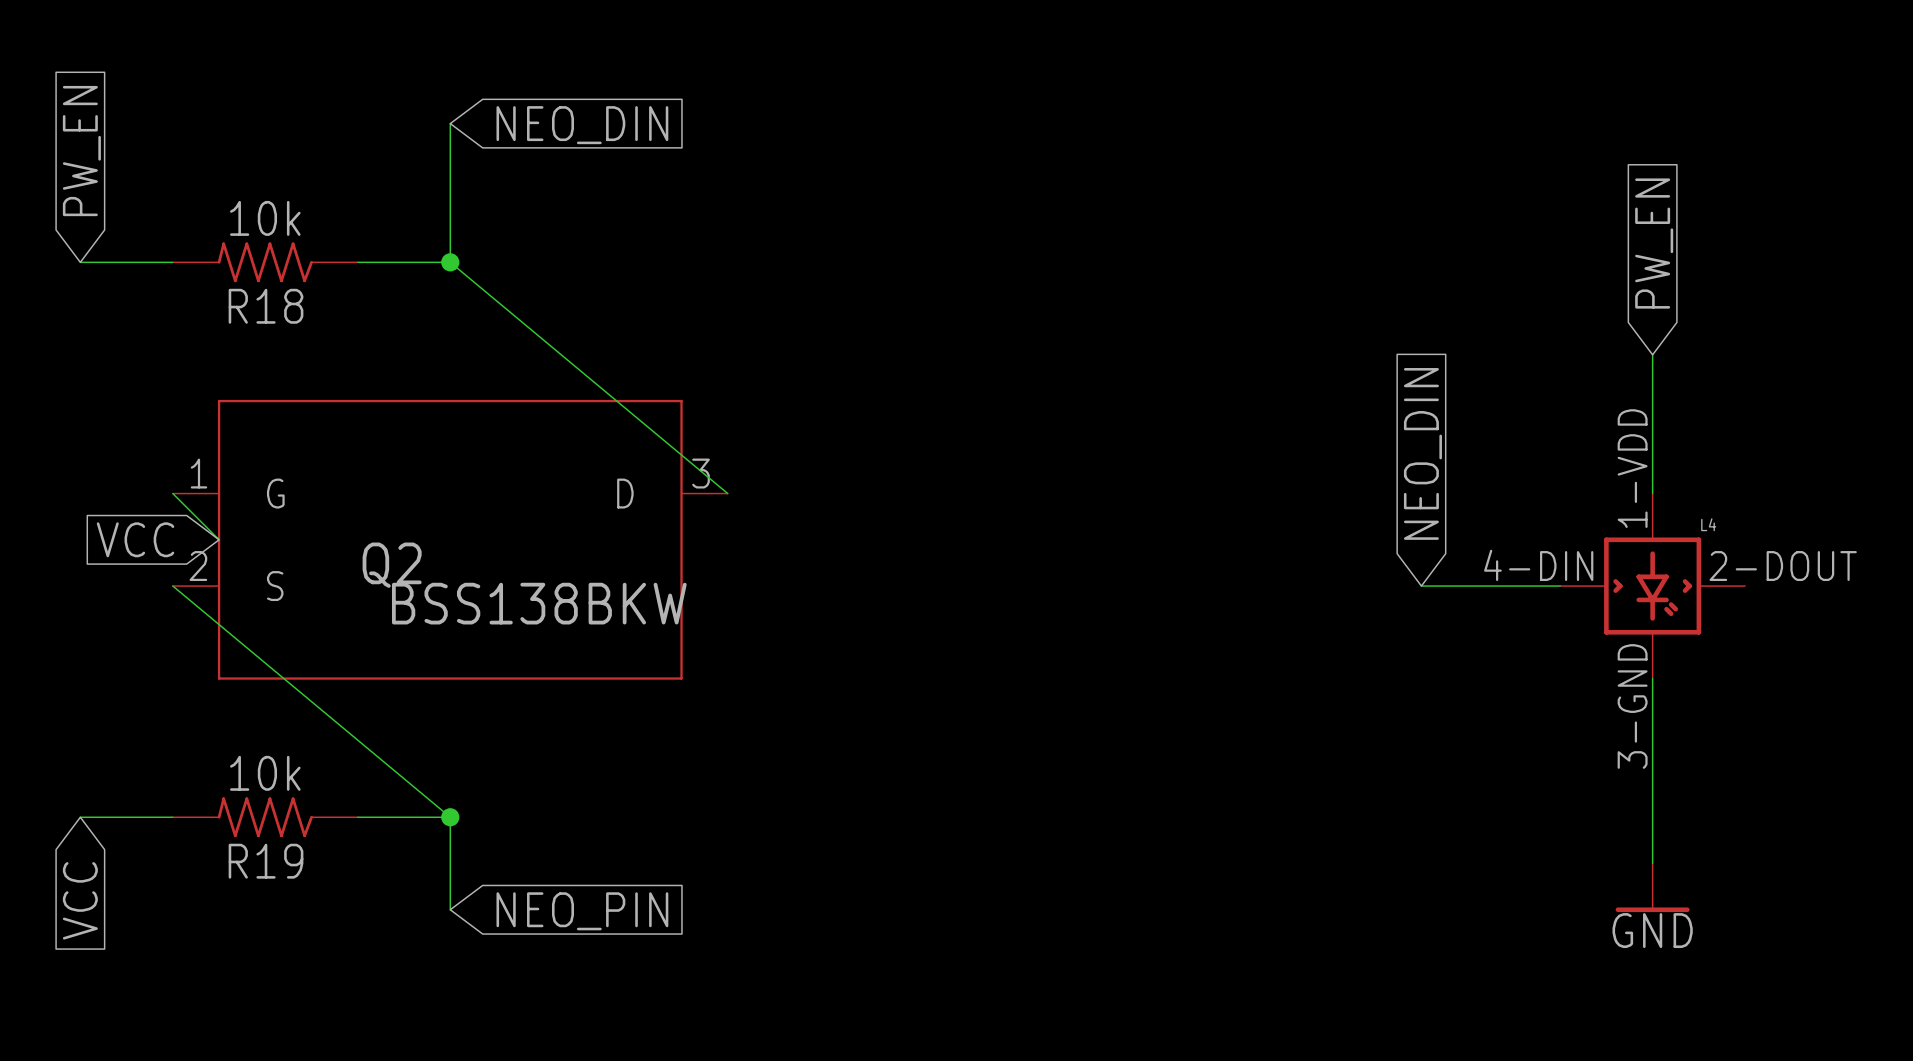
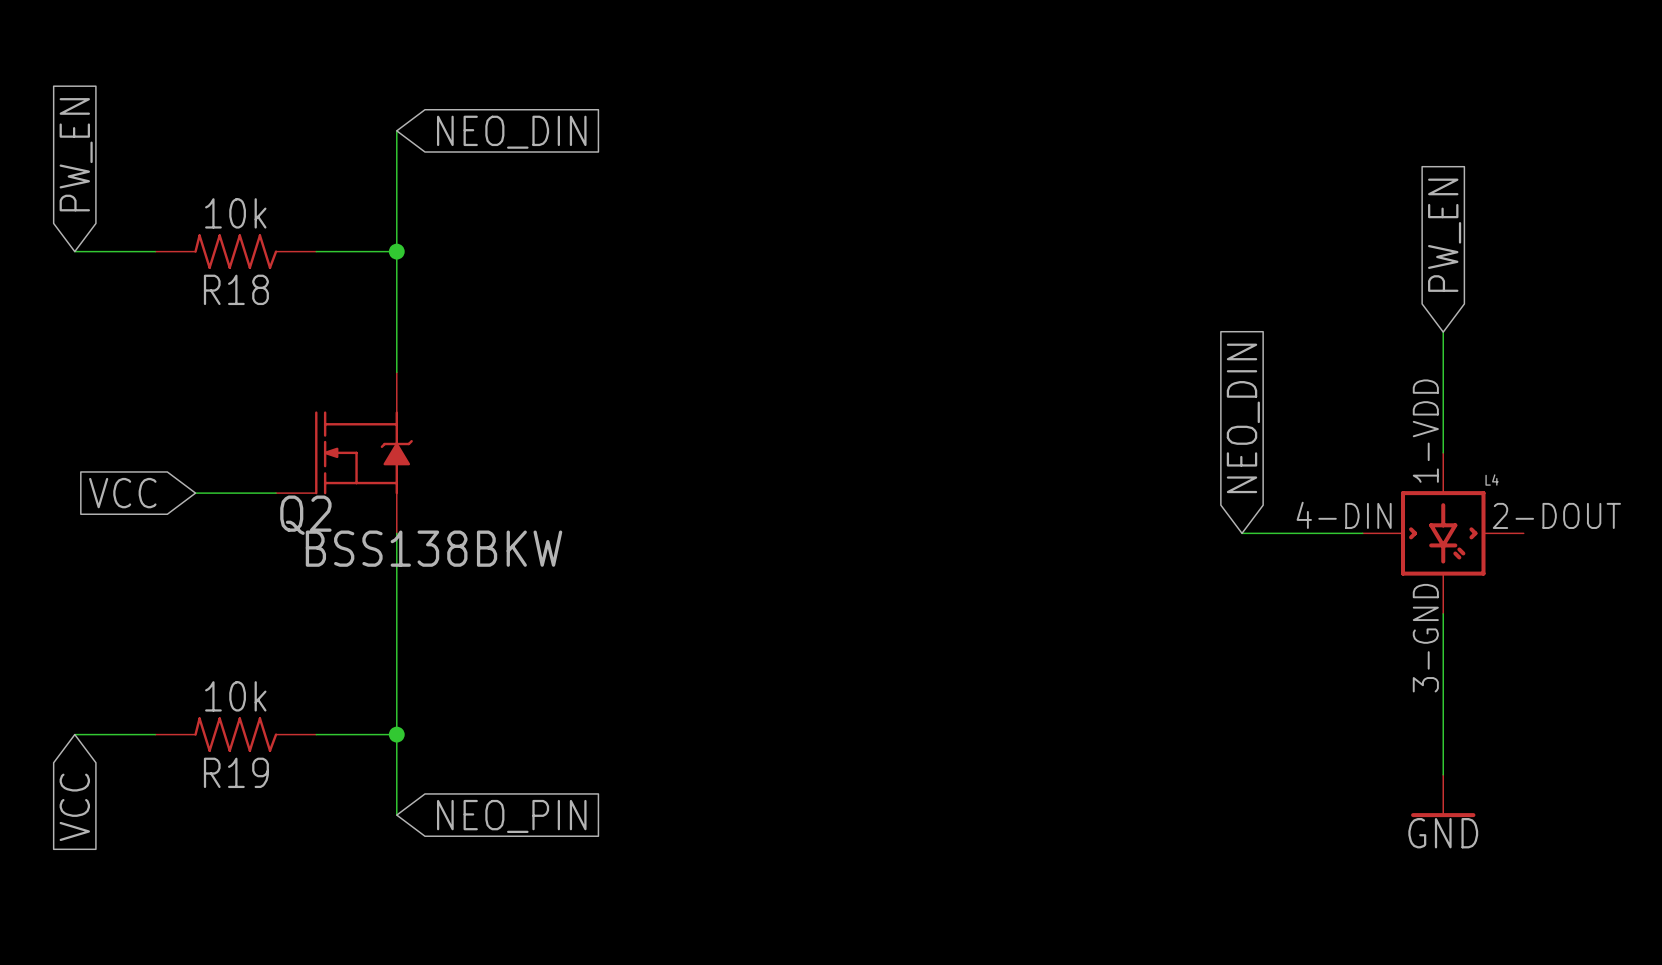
wire: (450, 262) (727, 493) -> (396, 251) (396, 372)
Q2 symbol: [172, 399, 728, 680] -> [276, 372, 413, 534]
wire: (172, 493) (219, 539) -> (276, 493) (195, 493)
Q2 name position: Q2 (392, 565) -> Q2 (305, 515)
wire: (172, 586) (450, 817) -> (396, 533) (396, 734)
Q2 value position: BSS138BKW (539, 603) -> BSS138BKW (434, 548)

